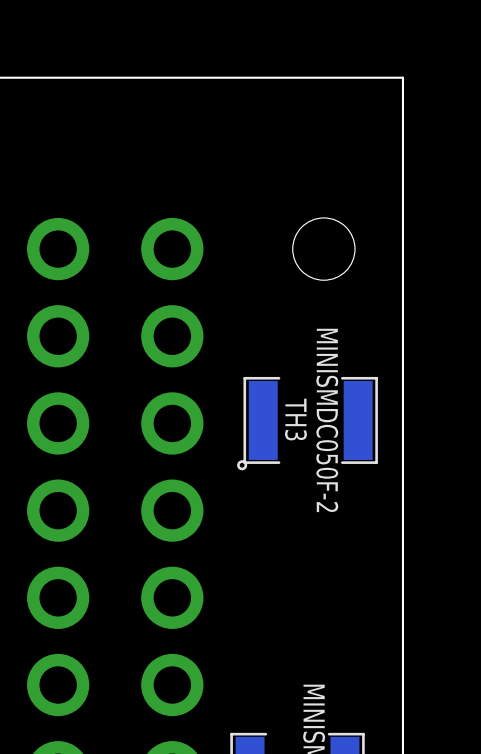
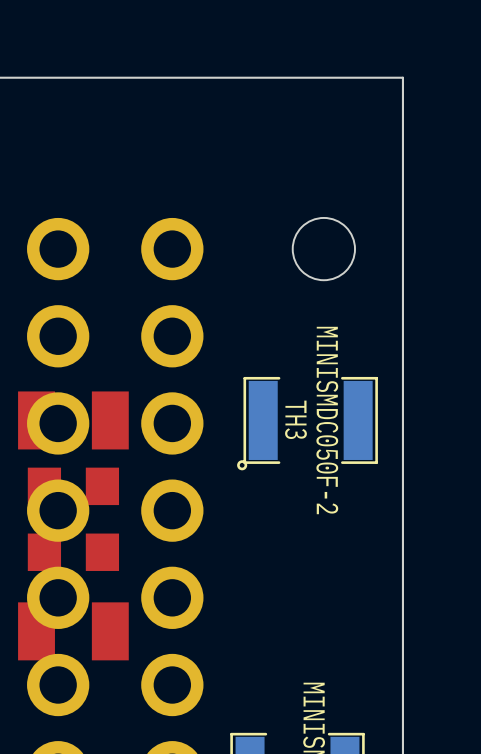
part: none -> (73, 420)
part: none -> (73, 486)
part: none -> (73, 552)
part: none -> (73, 631)

